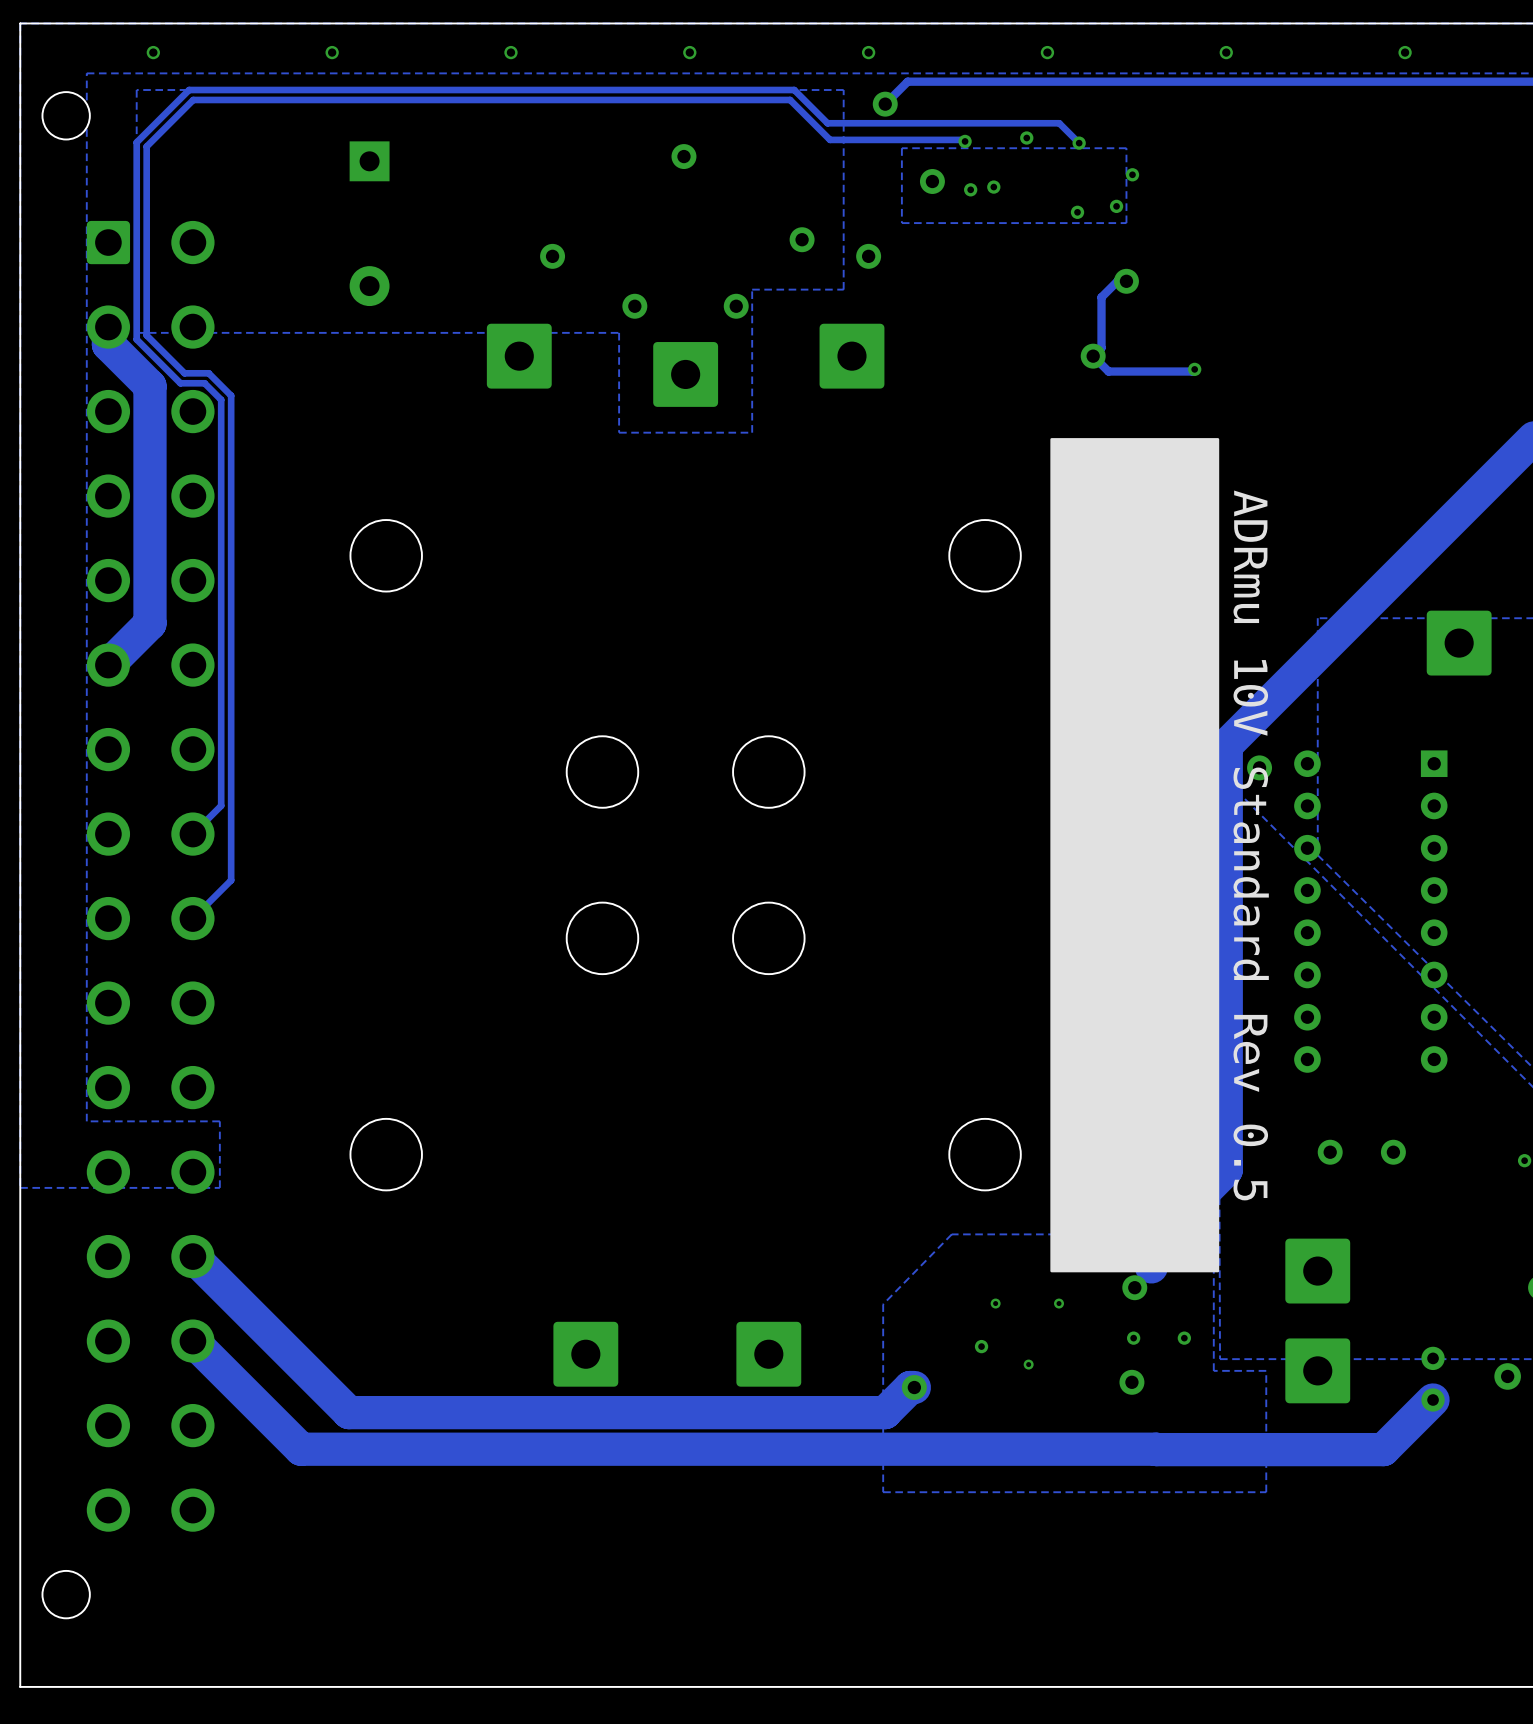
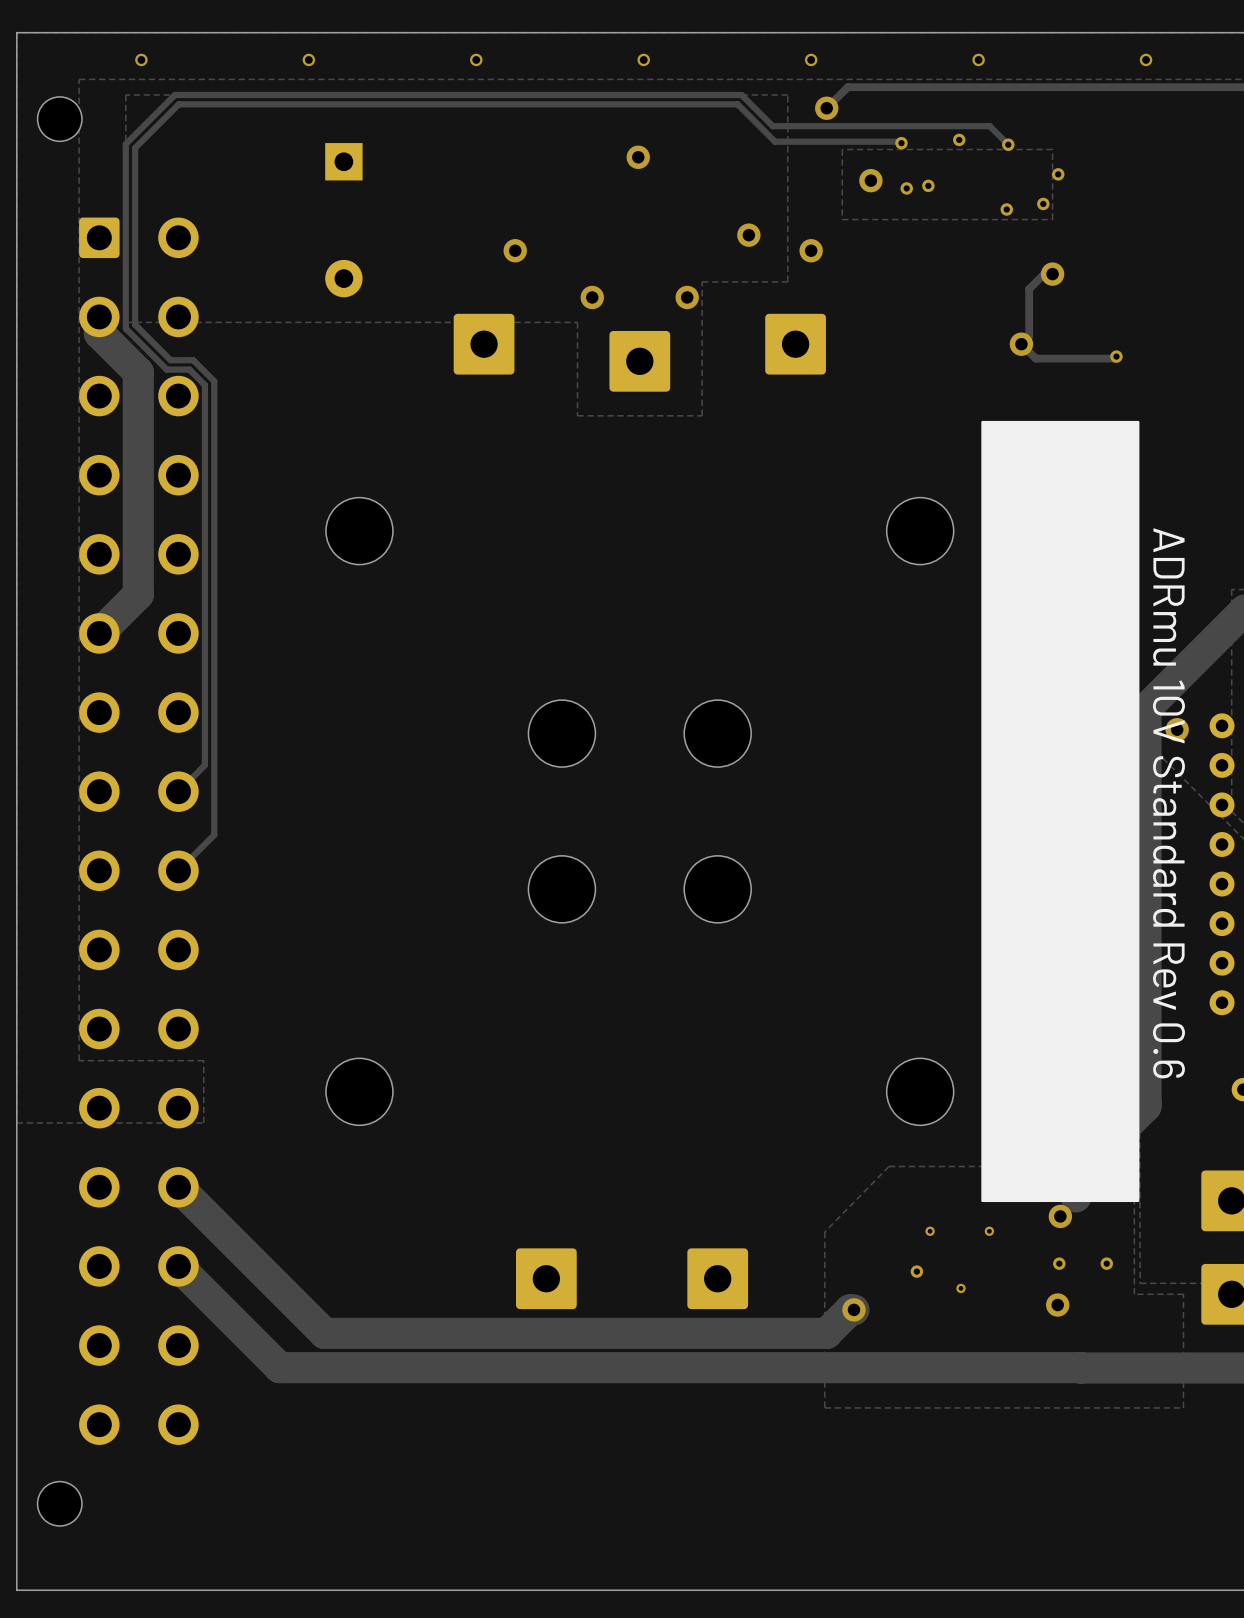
text: ADRmu 10V Standard Rev 0.5 (1251, 845) -> ADRmu 10V Standard Rev 0.6 (1168, 803)

